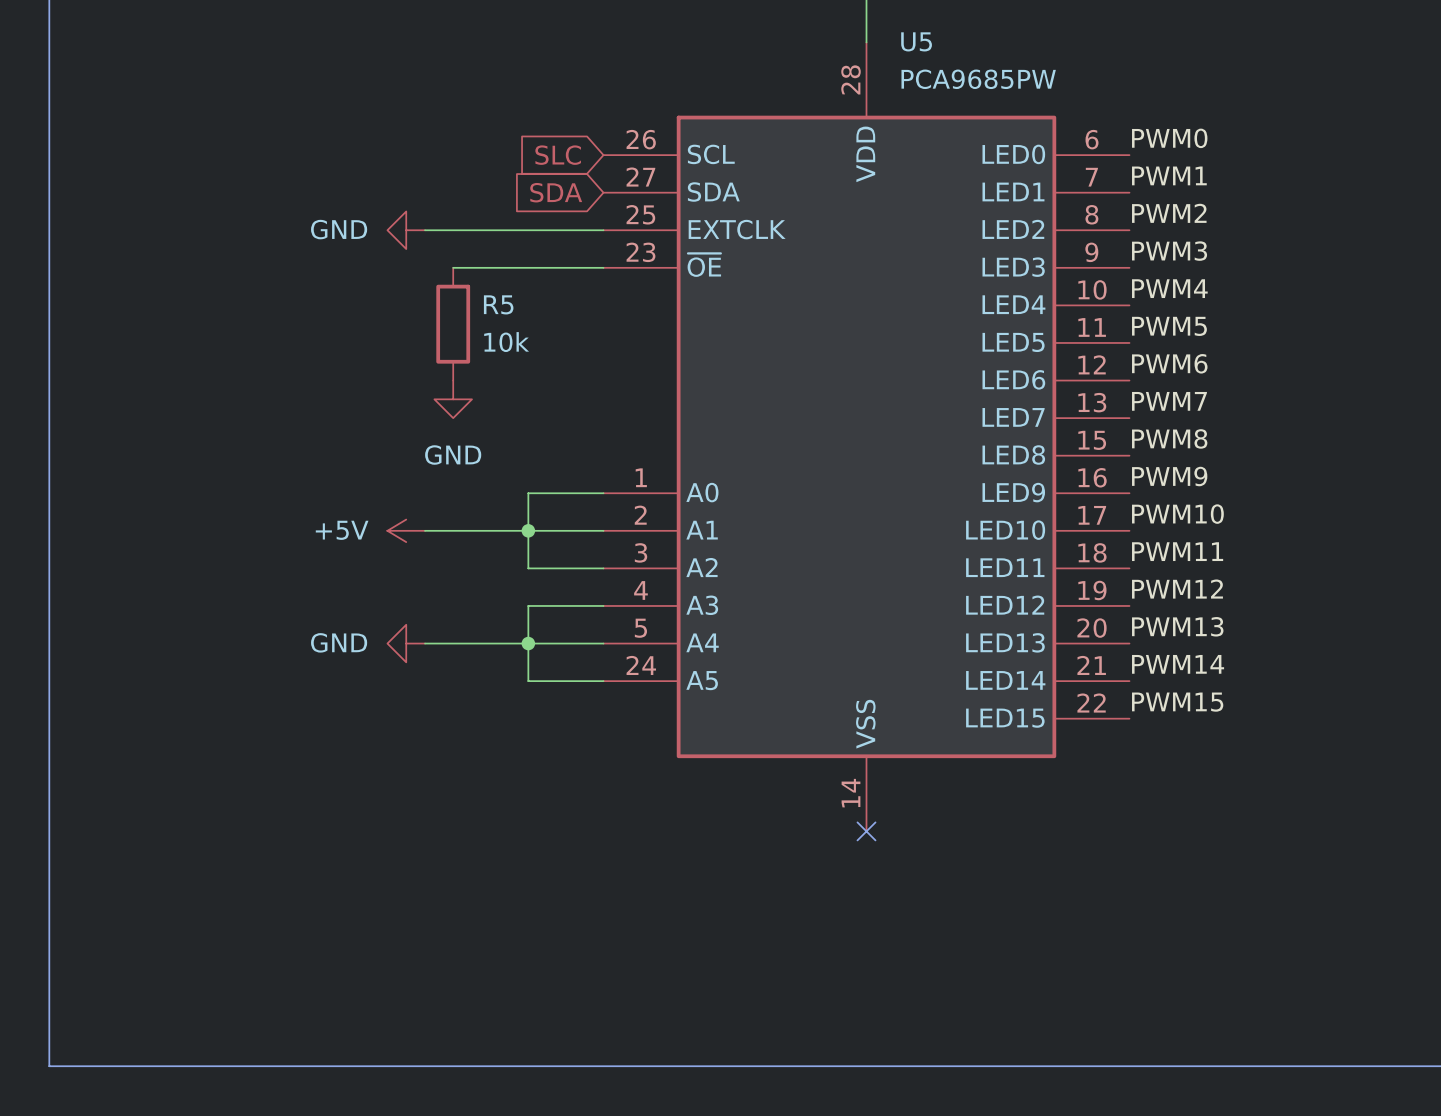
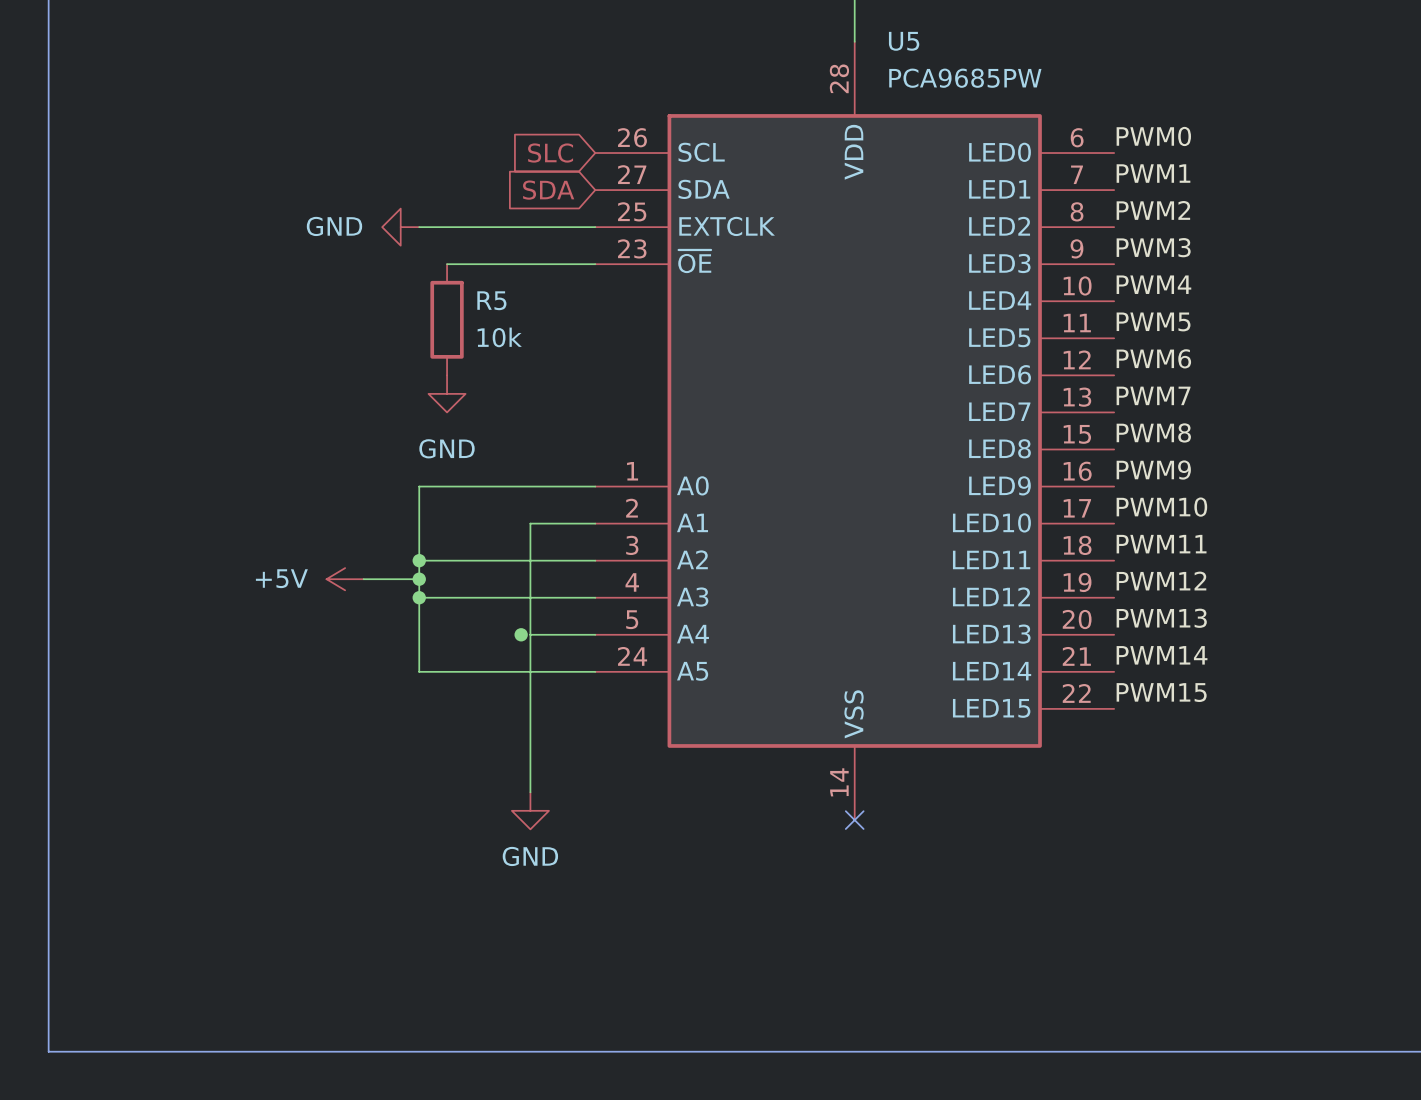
wire: (528, 493) (528, 568) -> (521, 486) (419, 486) (419, 671) (521, 671)
power symbol position: +5V (406, 530) -> +5V (345, 579)
wire: (425, 530) (537, 530) -> (530, 792) (530, 523)
junction: (528, 530) -> none
wire: none -> (419, 560) (521, 560)
junction: none -> (419, 560)
wire: none -> (363, 579) (419, 579)
junction: none -> (419, 579)
junction: none -> (419, 597)
wire: (528, 605) (528, 681) -> (521, 597) (419, 597)
power symbol rotation: 0° (406, 643) -> 90° counterclockwise (530, 810)
power symbol position: GND (406, 643) -> GND (530, 810)
wire: (425, 643) (537, 643) -> none

